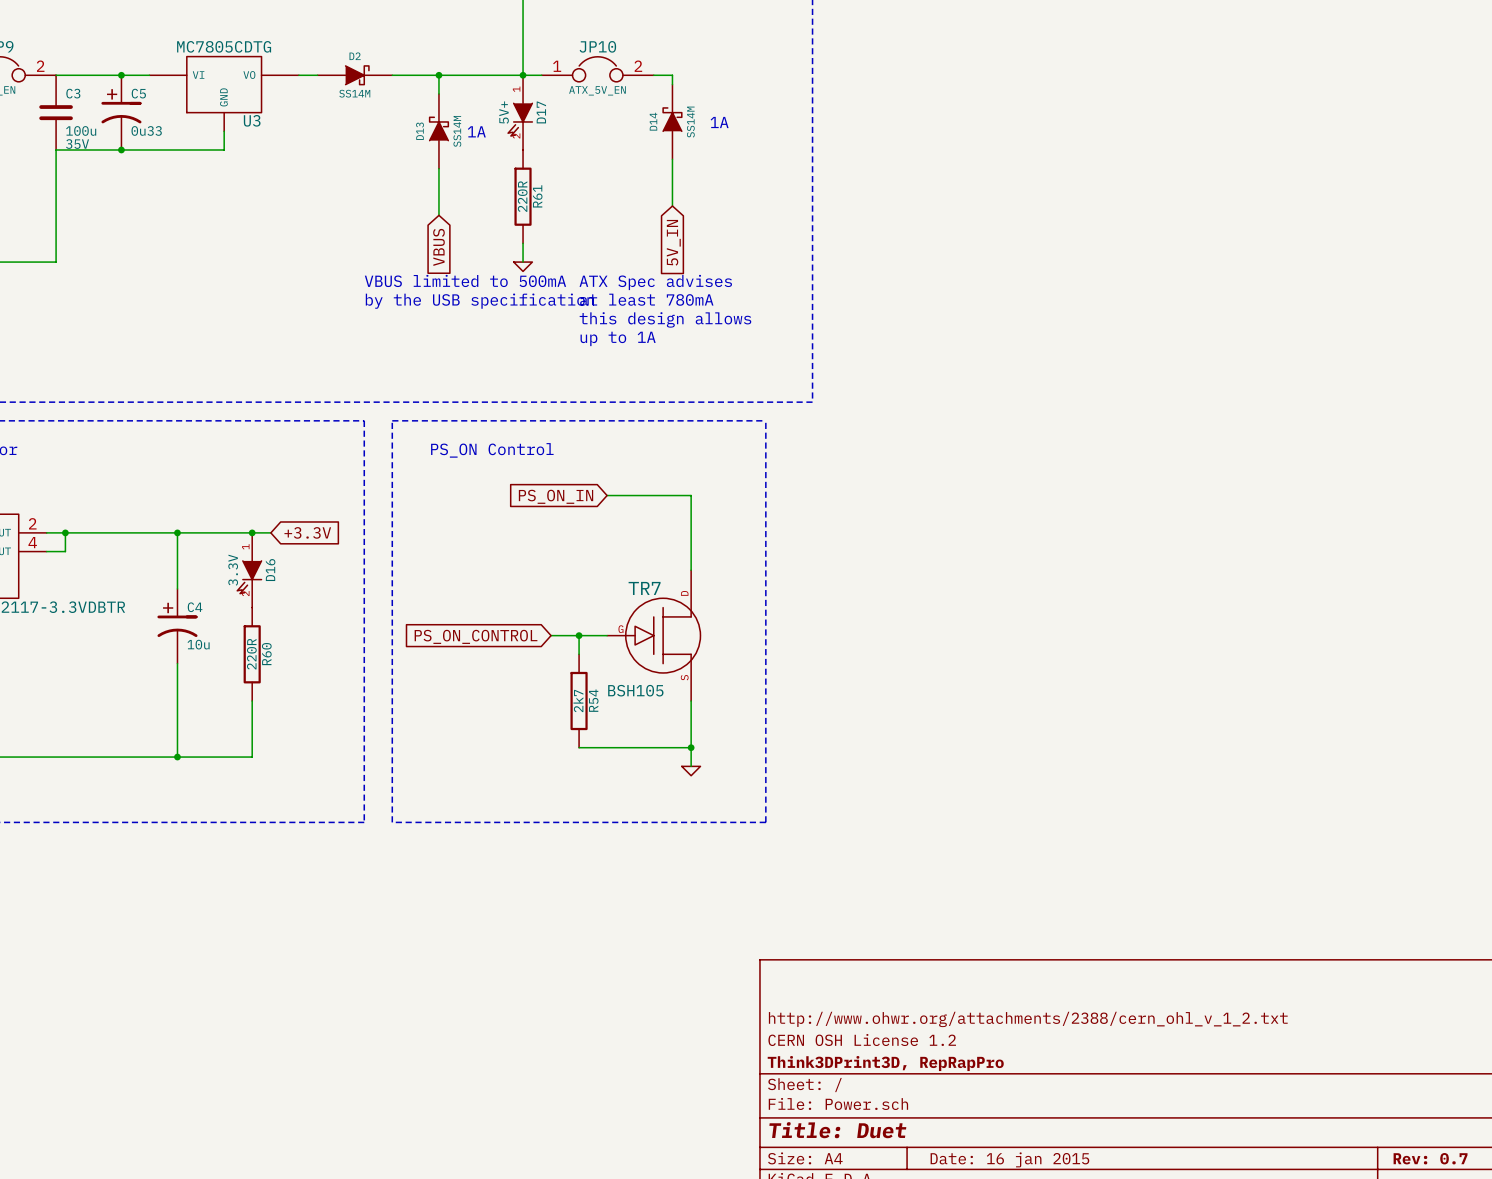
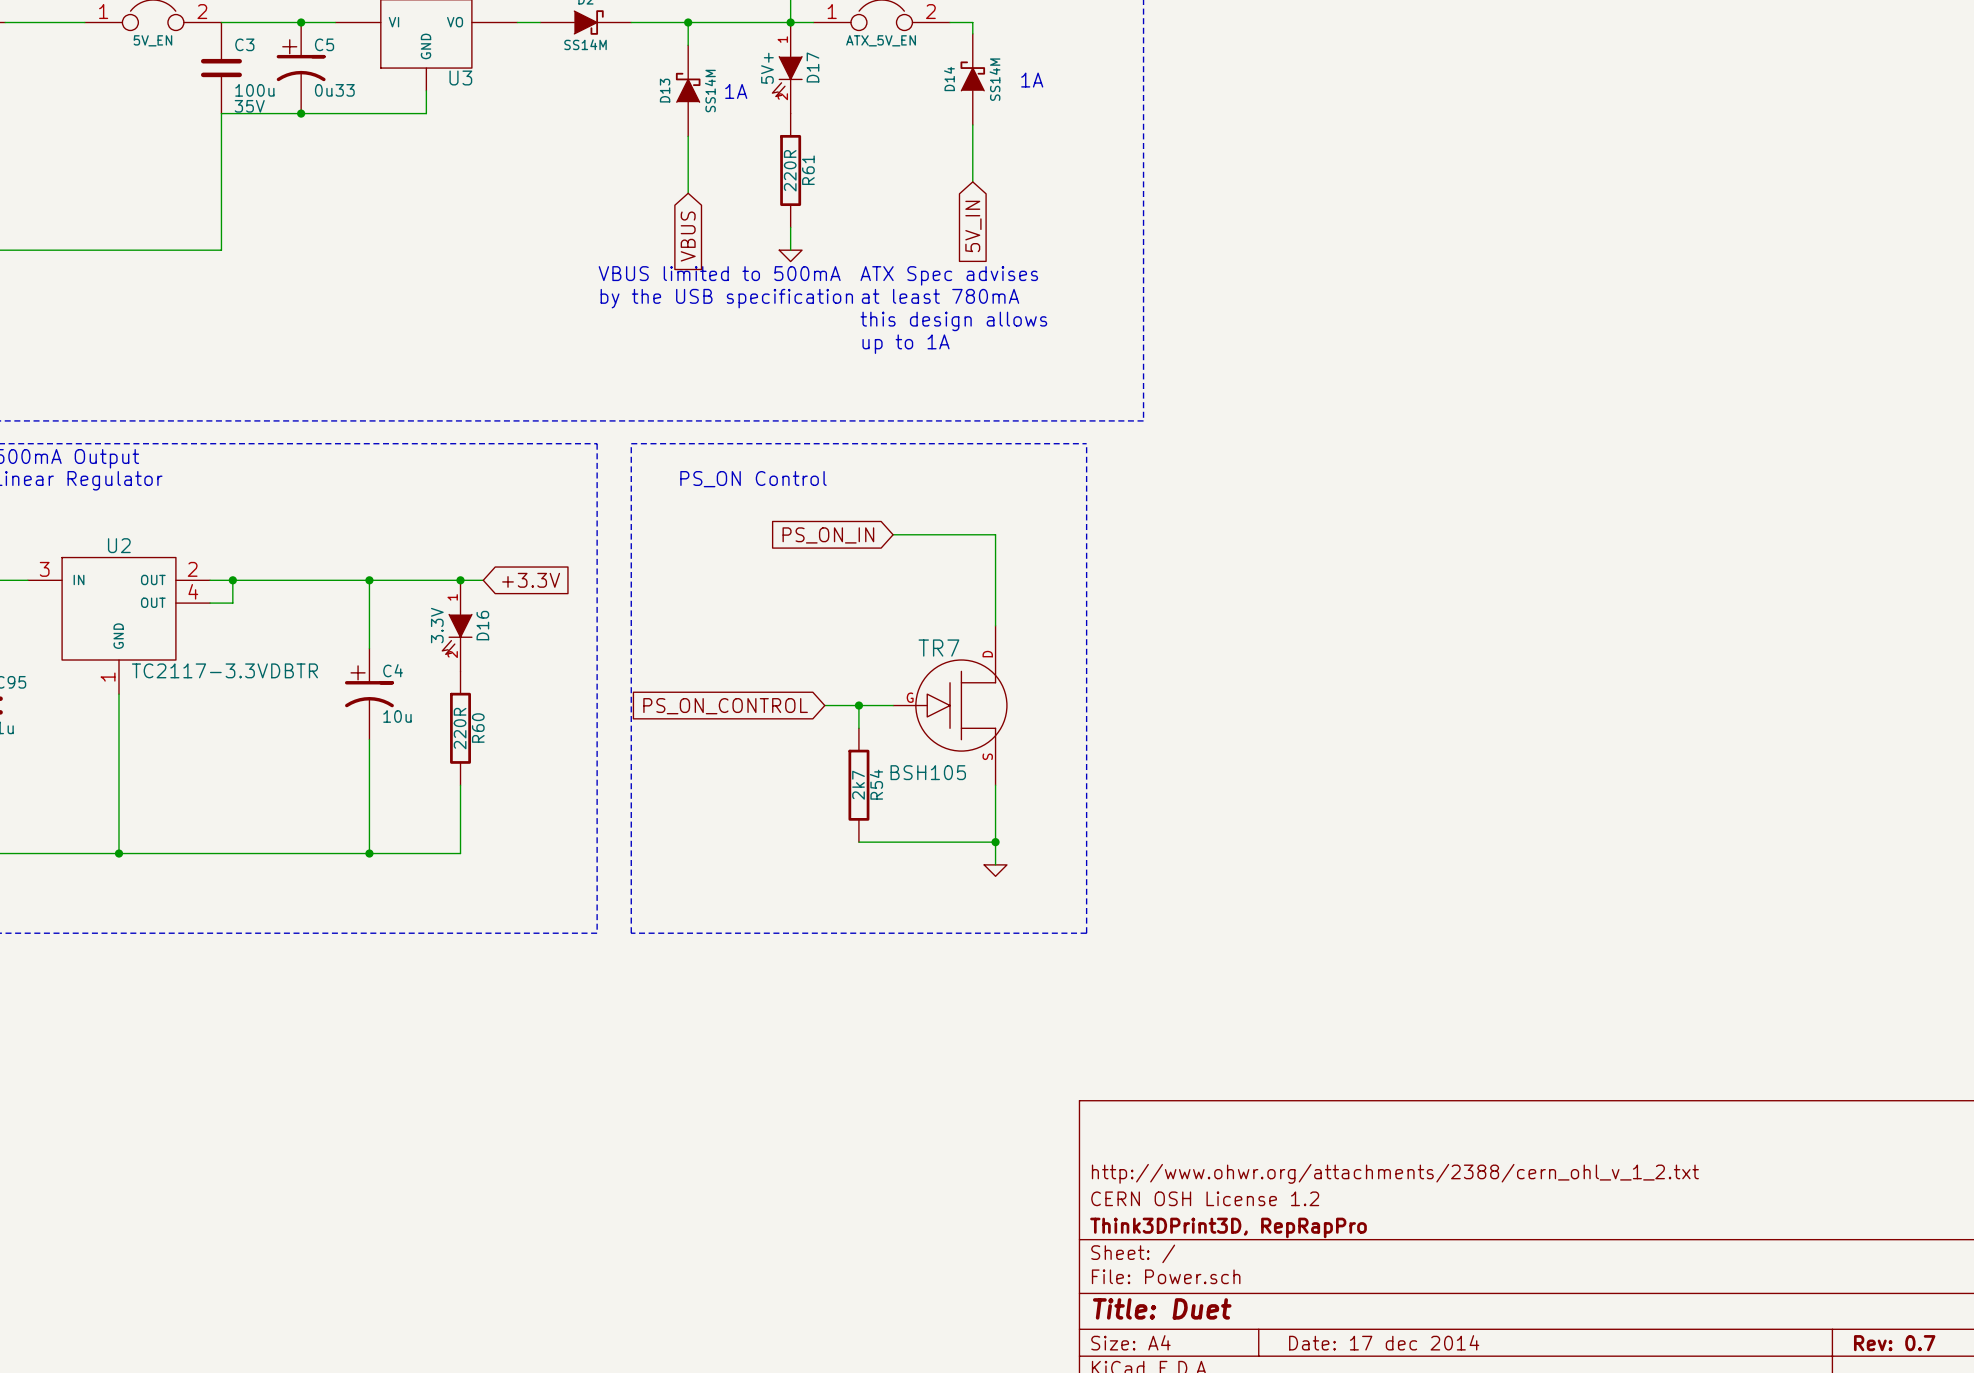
title block: Date: 16 jan 2015 (1009, 1159) -> Date: 17 dec 2014 (1384, 1342)

